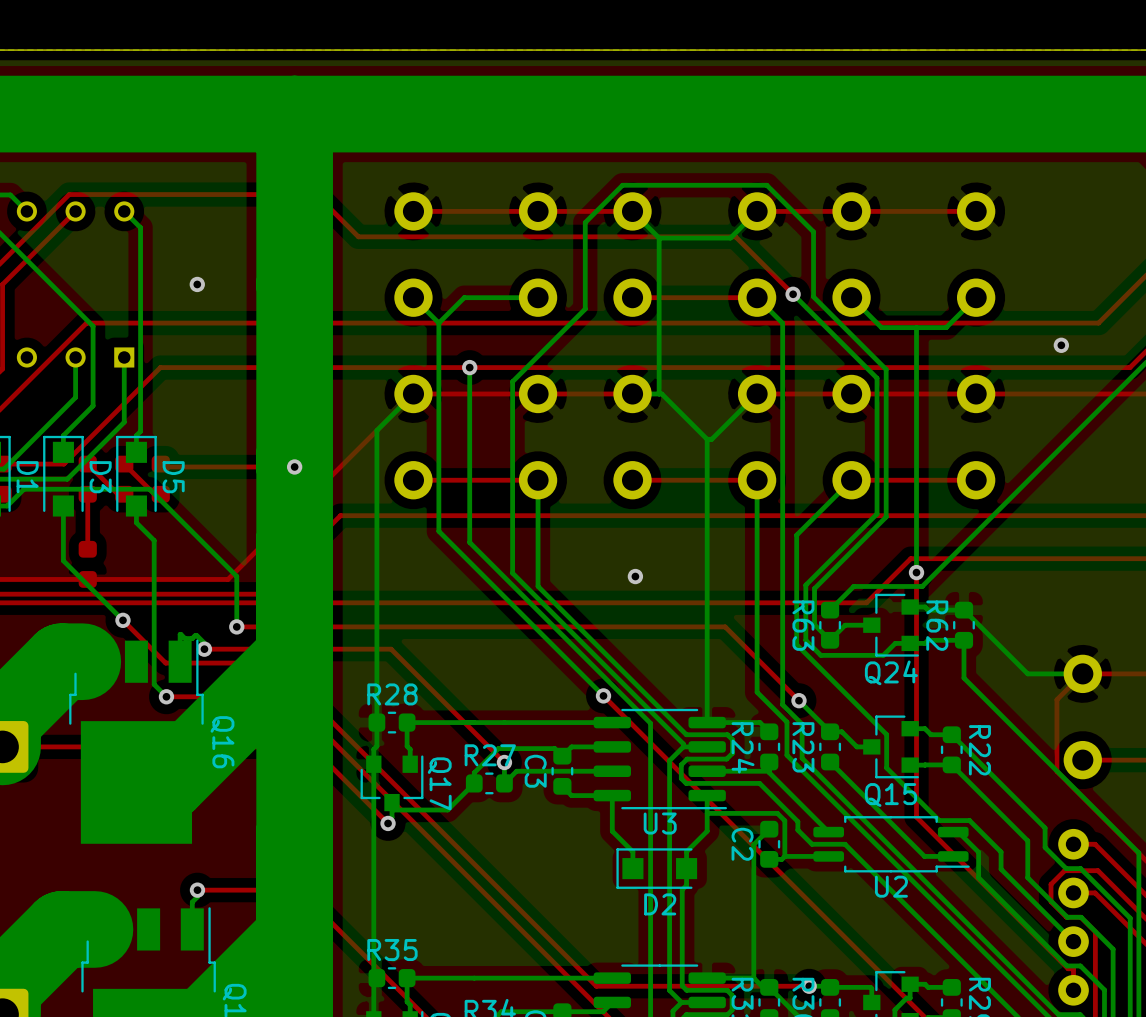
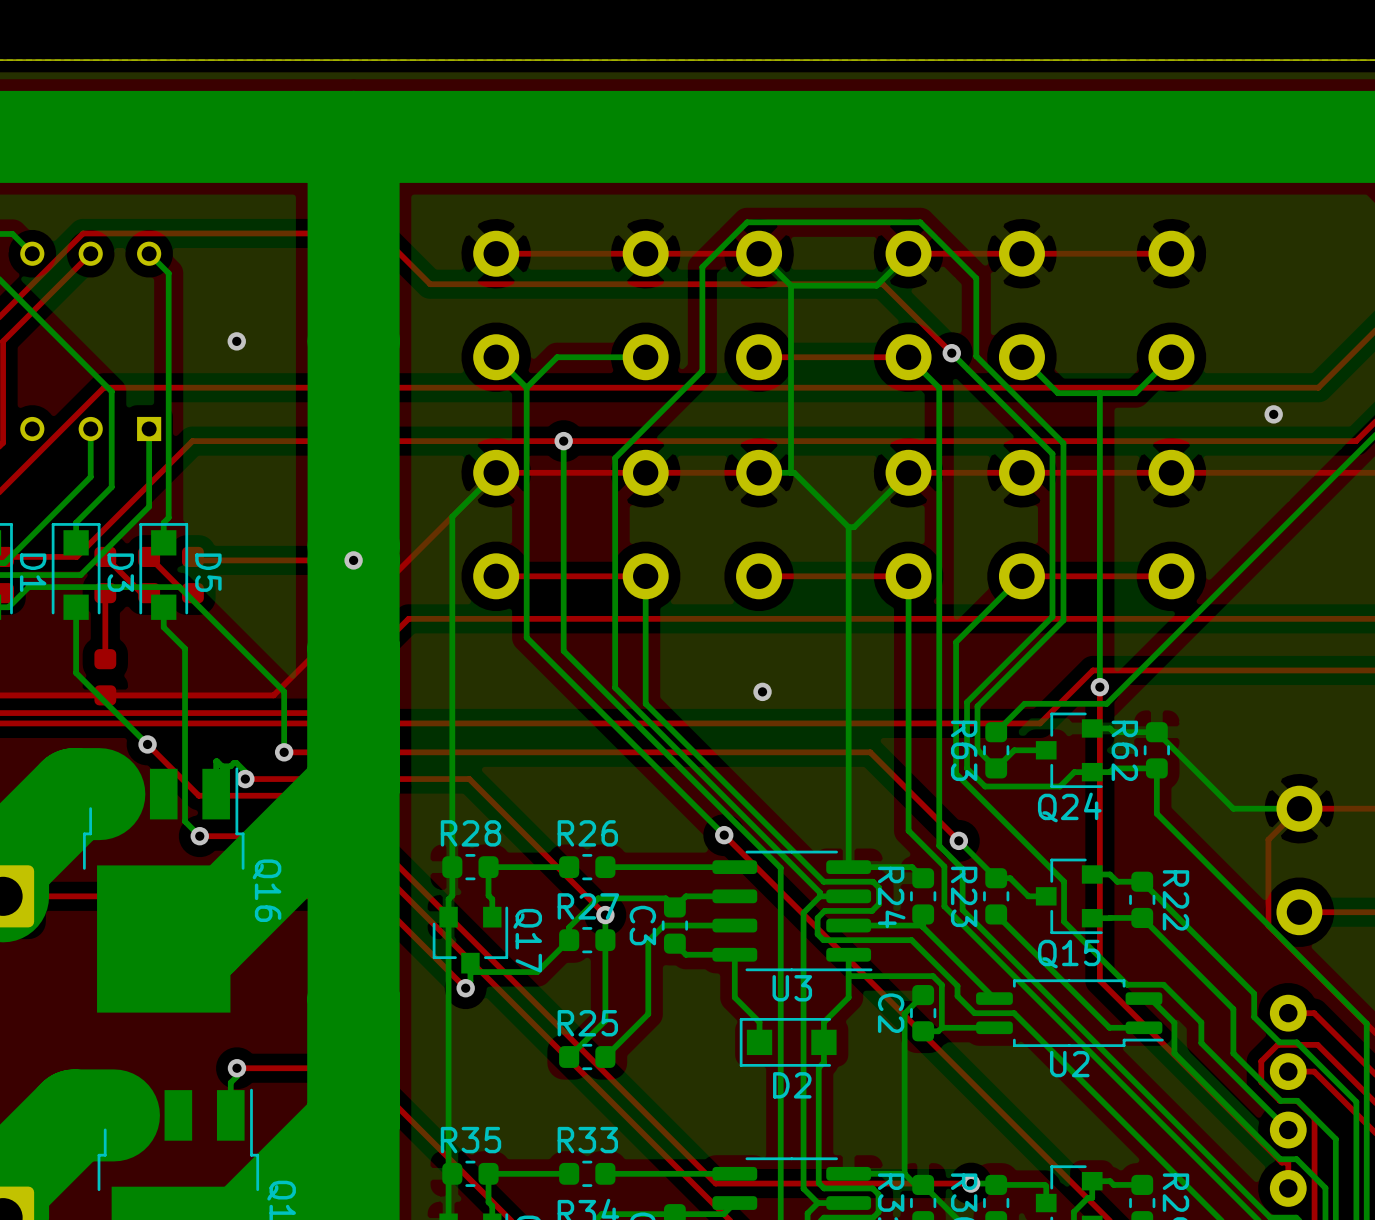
R26: none -> (587, 867)
bottom track: (504, 722) (474, 722) -> none
bottom track: (553, 771) (516, 771) (504, 783) -> (663, 925) (648, 941) (648, 1014) (605, 1056)
bottom track: none -> (605, 940) (605, 1020) (569, 1056)
R25: none -> (587, 1056)
R33: none -> (587, 1173)
bottom track: (504, 978) (474, 978) -> none

